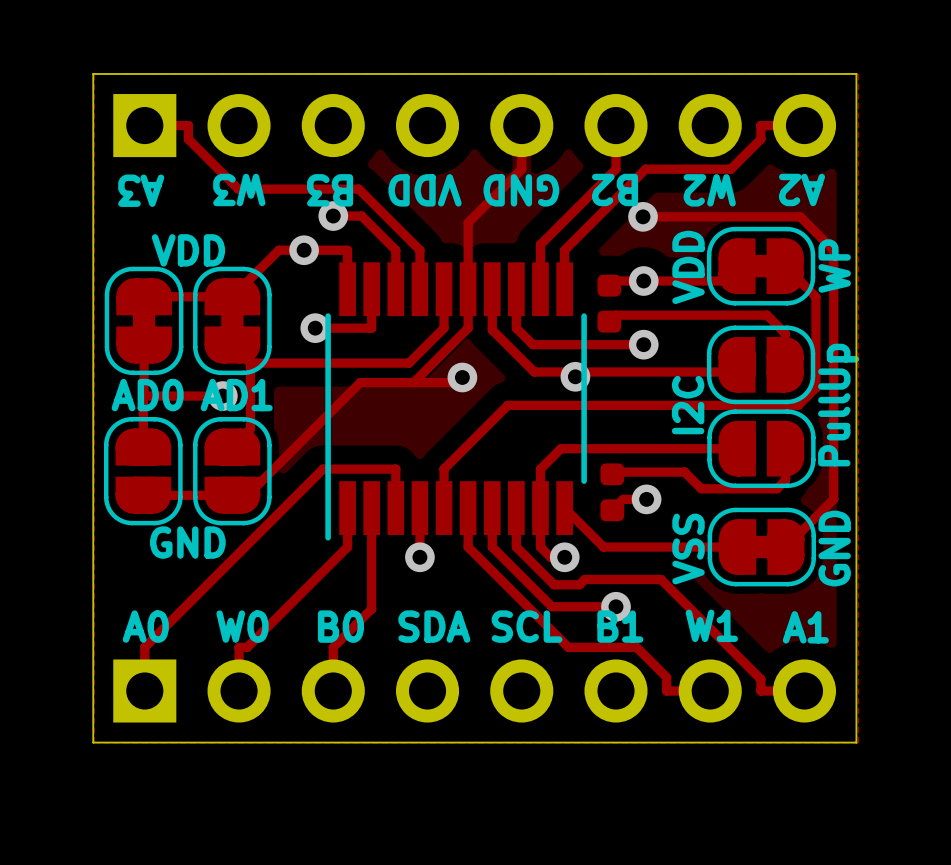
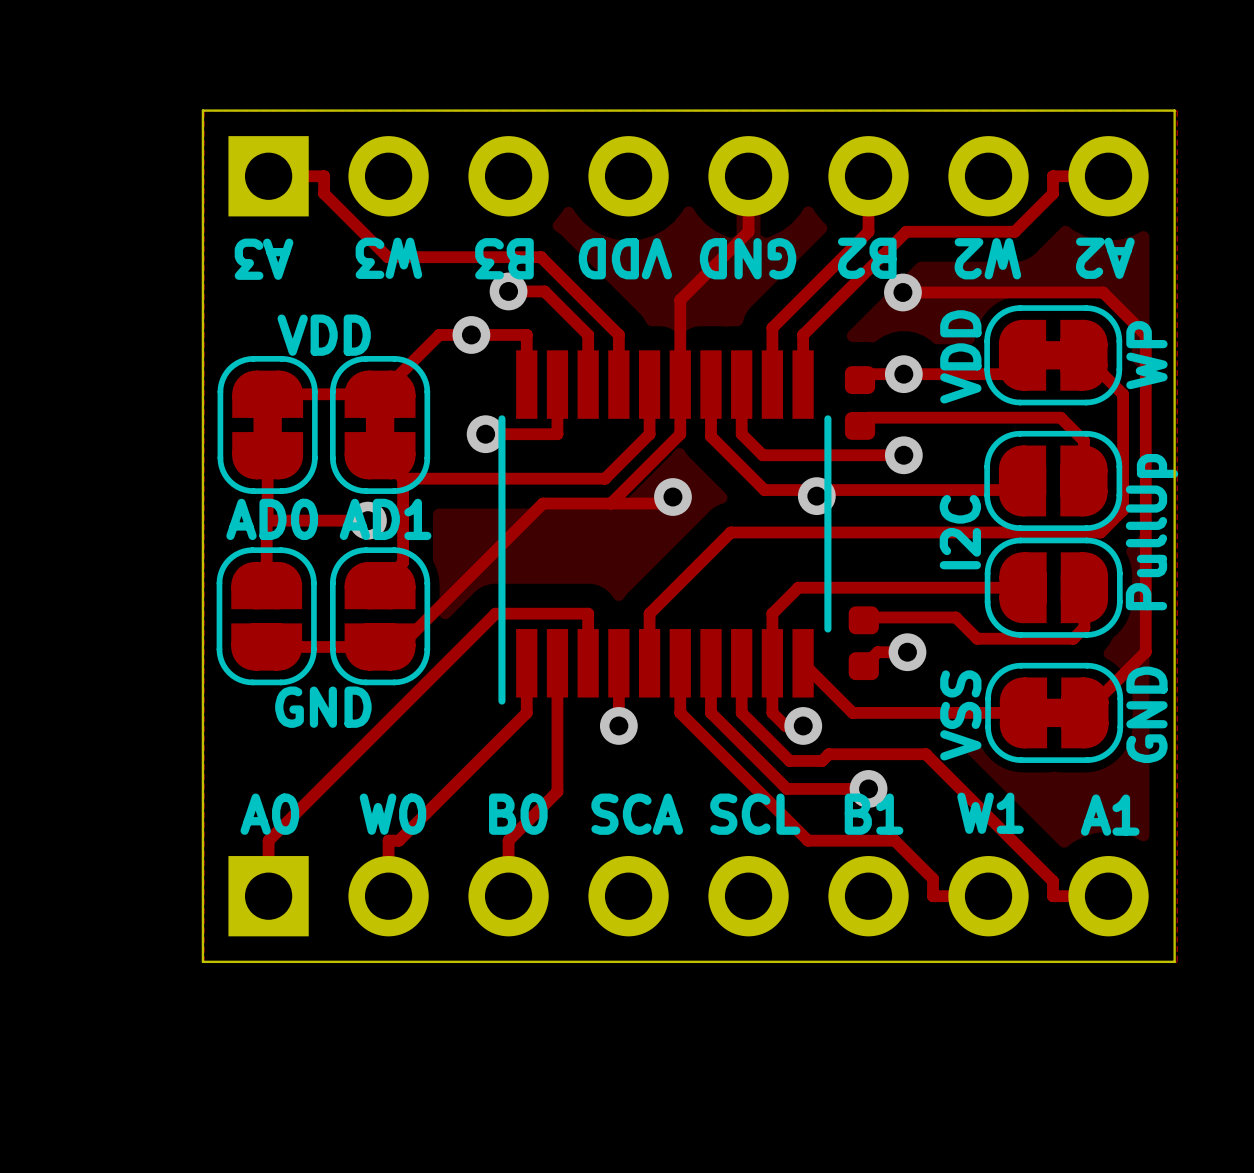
text: SDA (434, 626) -> SCA (637, 814)

